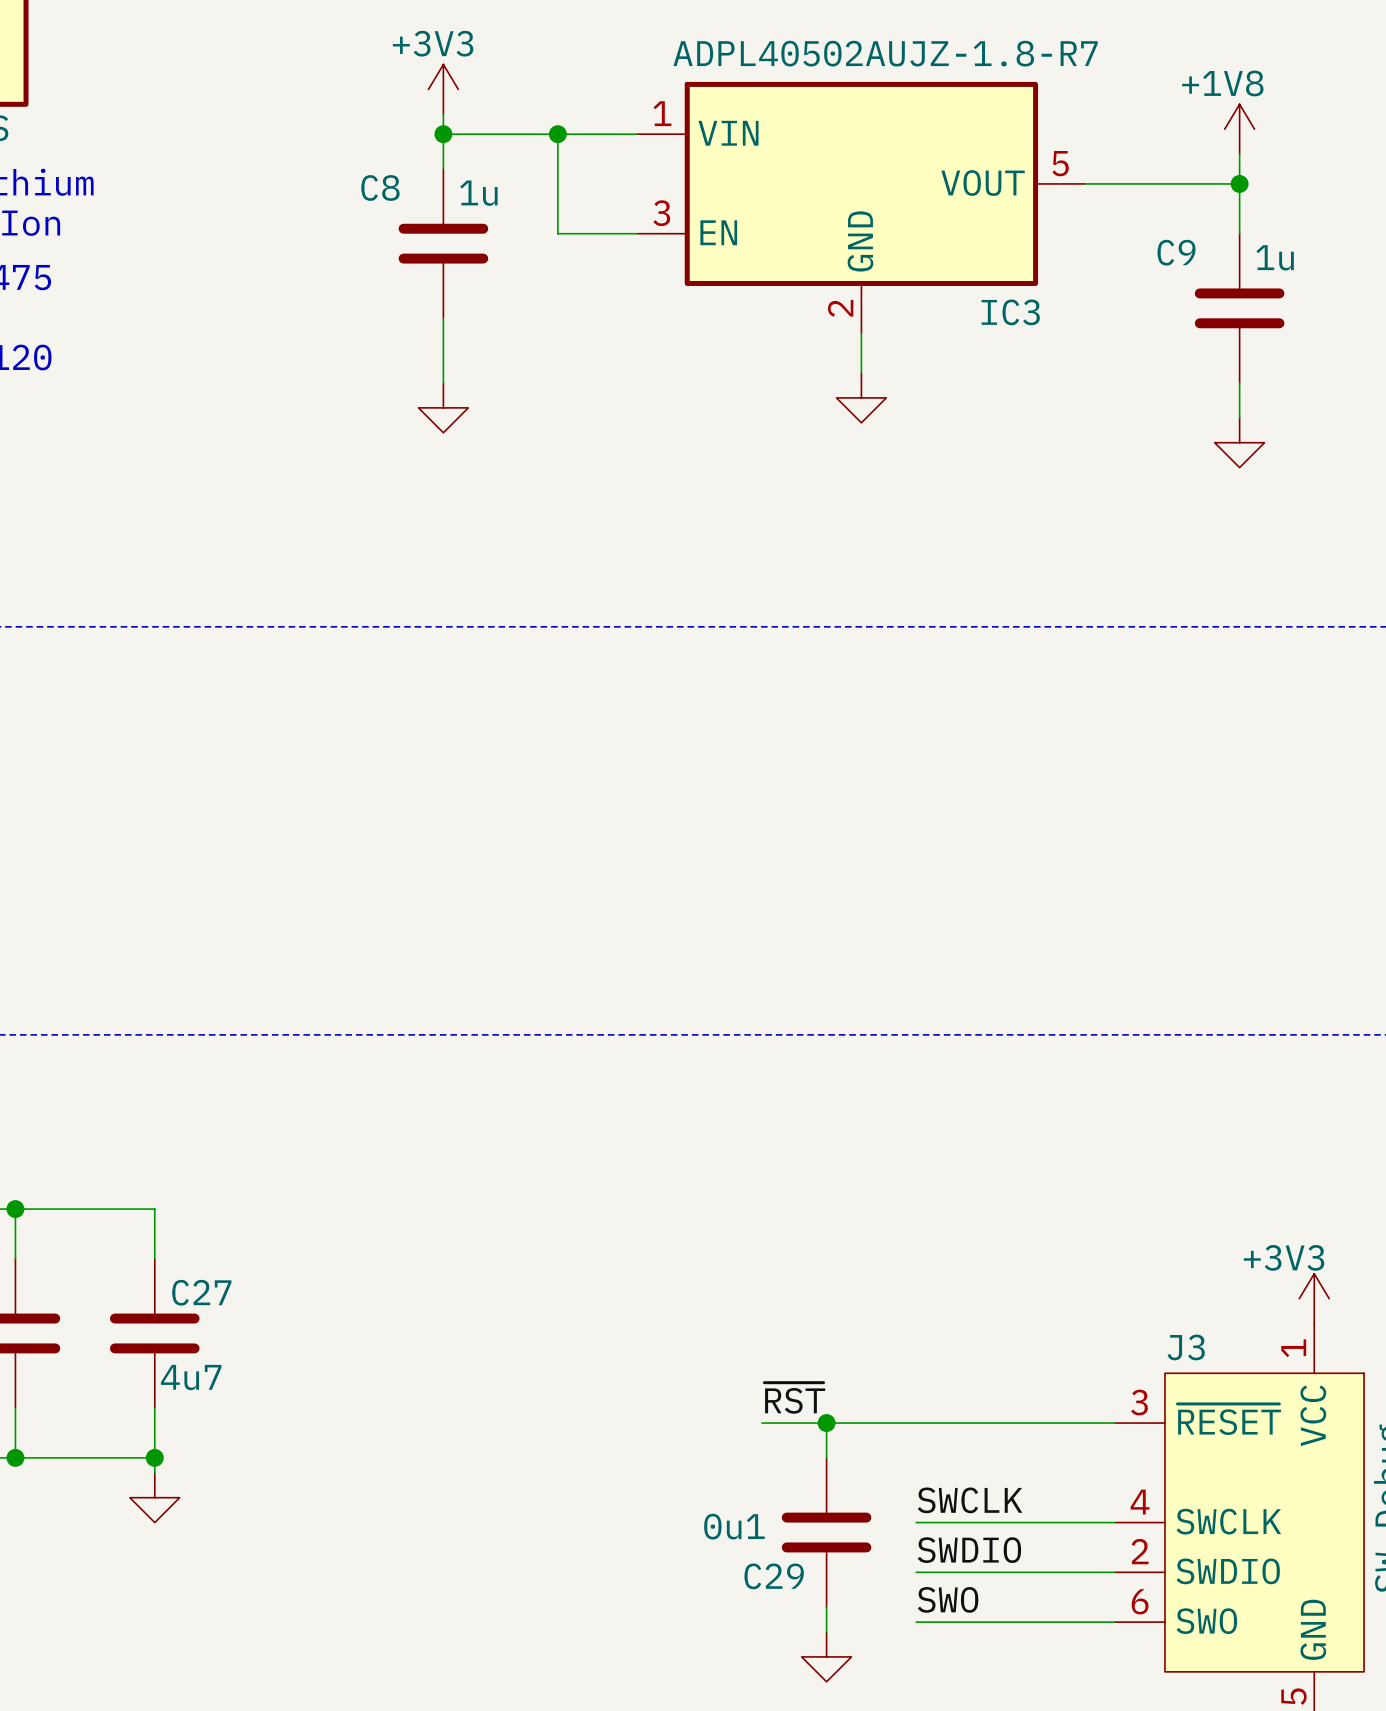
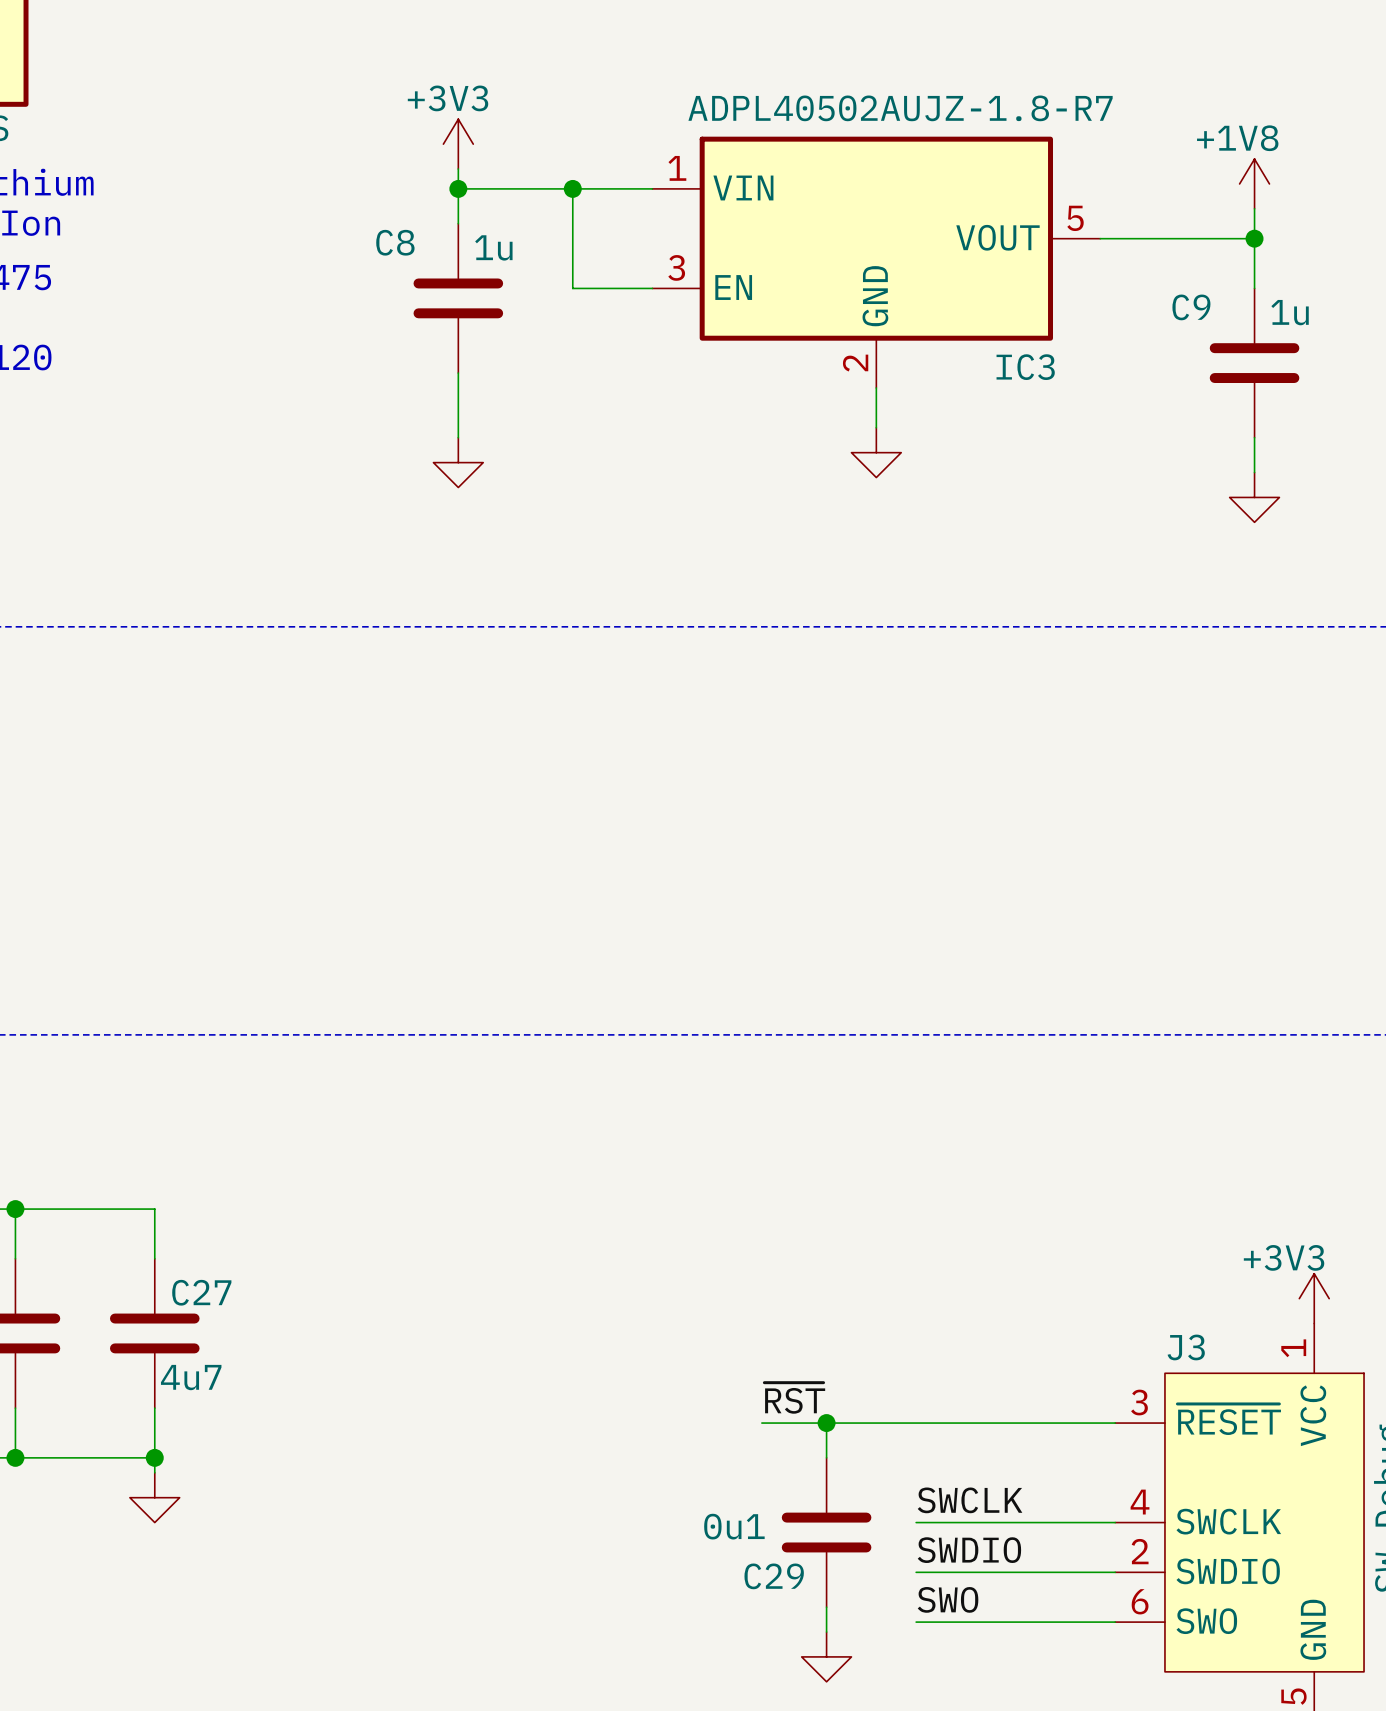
power symbol position: +3V3 (443, 89) -> +3V3 (458, 144)
wire: (443, 114) (443, 169) -> (458, 169) (458, 223)
power symbol position: +1V8 (1239, 129) -> +1V8 (1254, 183)
wire: (443, 134) (637, 134) -> (458, 188) (652, 188)
junction: (443, 134) -> none
wire: (557, 134) (557, 233) (637, 233) -> (572, 188) (572, 288) (652, 288)
junction: (557, 134) -> none
wire: (1239, 154) (1239, 233) -> (1254, 208) (1254, 288)
wire: (1085, 183) (1239, 183) -> (1100, 238) (1254, 238)
junction position: (1239, 183) -> (1254, 238)
junction: none -> (458, 188)
junction: none -> (572, 188)
IC3 position: (861, 207) -> (876, 262)
C8 position: (443, 243) -> (458, 298)
C9 position: (1239, 308) -> (1254, 363)
wire: (443, 318) (443, 382) -> (458, 373) (458, 437)
wire: (861, 333) (861, 373) -> (876, 387) (876, 427)
wire: (1239, 382) (1239, 417) -> (1254, 437) (1254, 472)
power symbol position: (861, 397) -> (876, 452)
power symbol position: (443, 407) -> (458, 462)
power symbol position: (1239, 442) -> (1254, 497)

